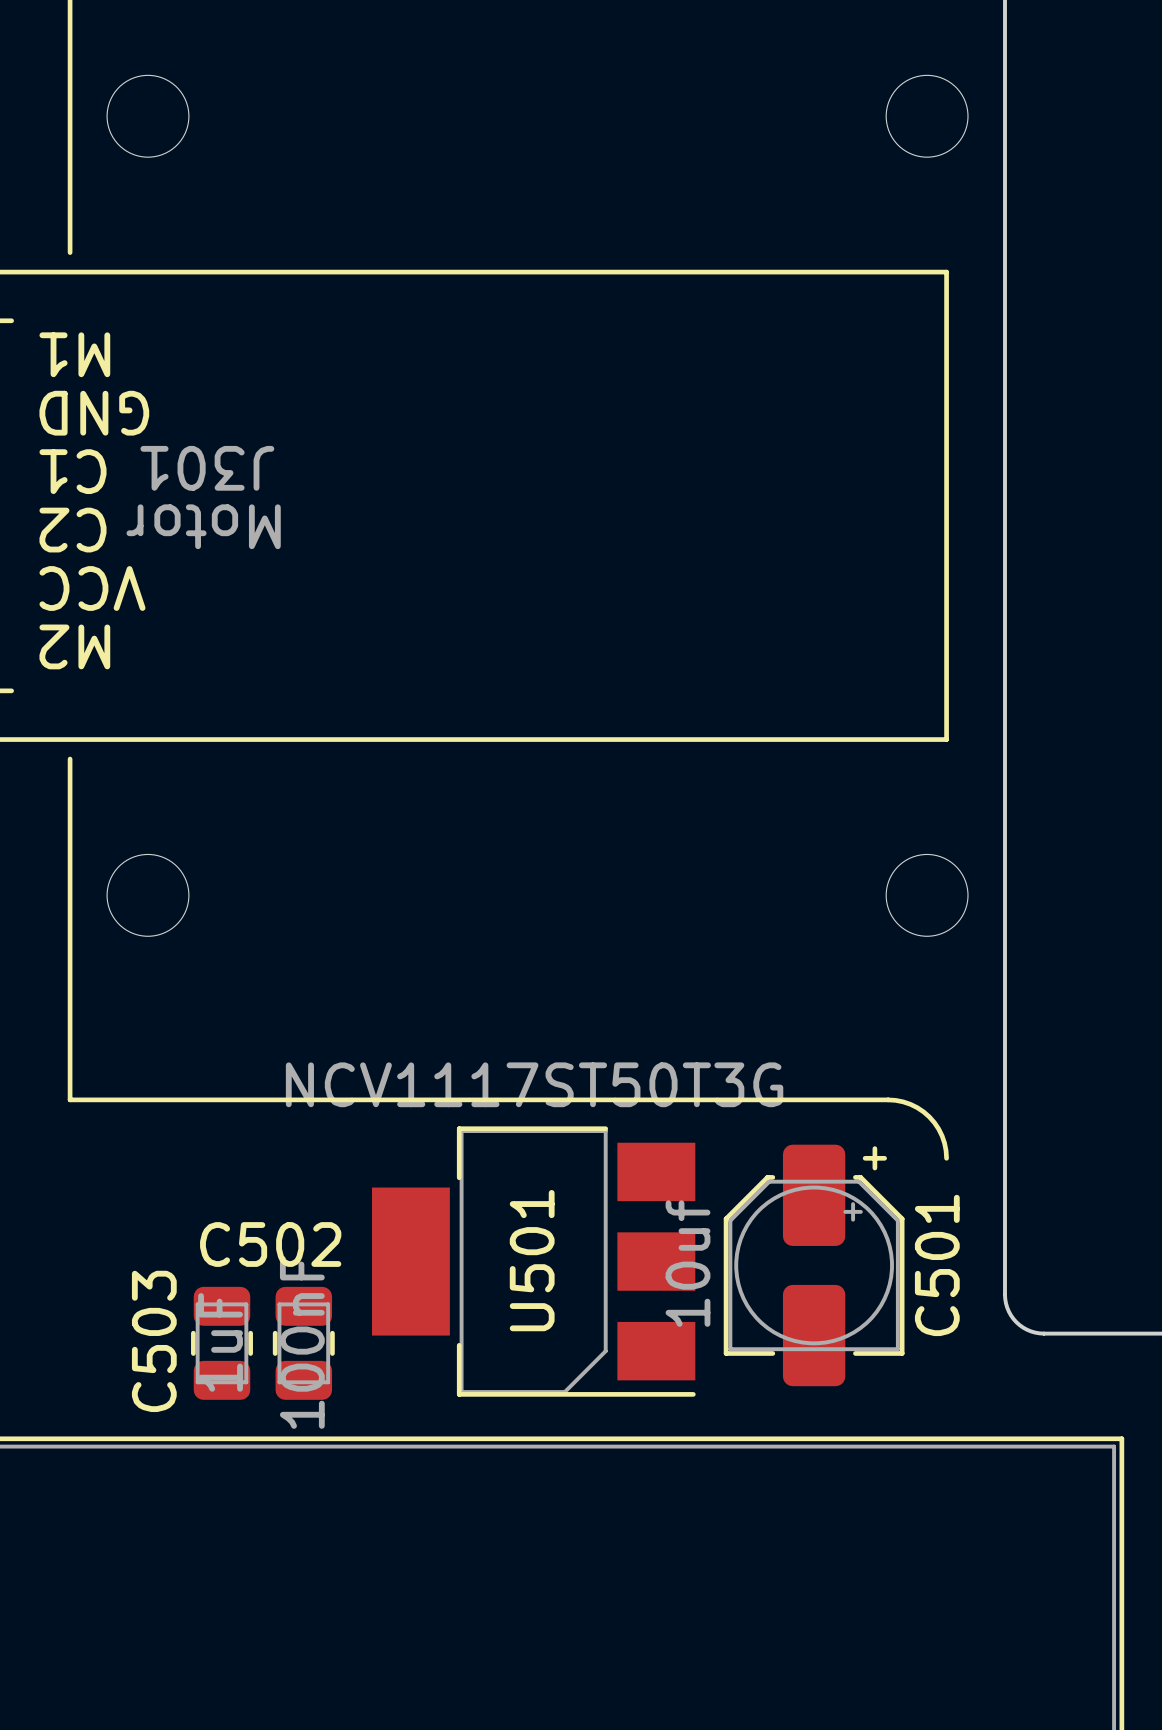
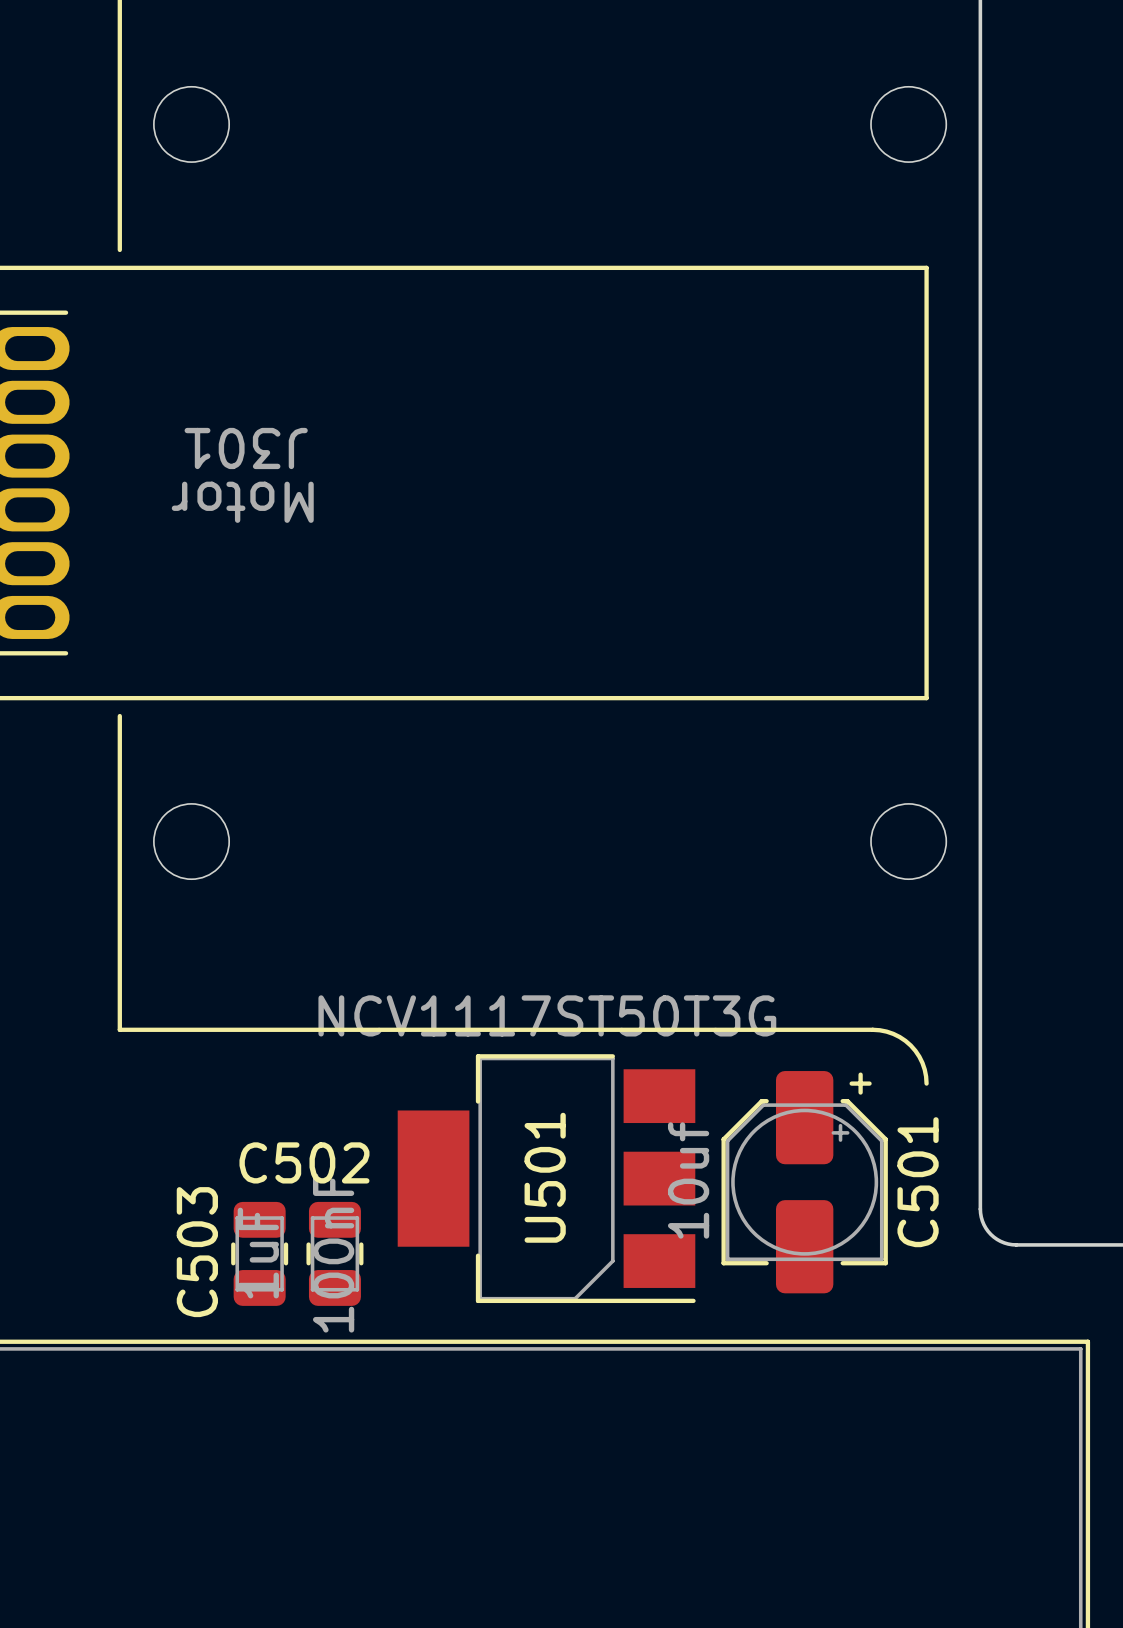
J301 text: M1 (74, 354) -> none
J301 text: GND (94, 413) -> none
J301 text: C1 (72, 471) -> none
J301 text: C2 (72, 530) -> none
J301 text: VCC (92, 588) -> none
J301 text: M2 (74, 646) -> none

